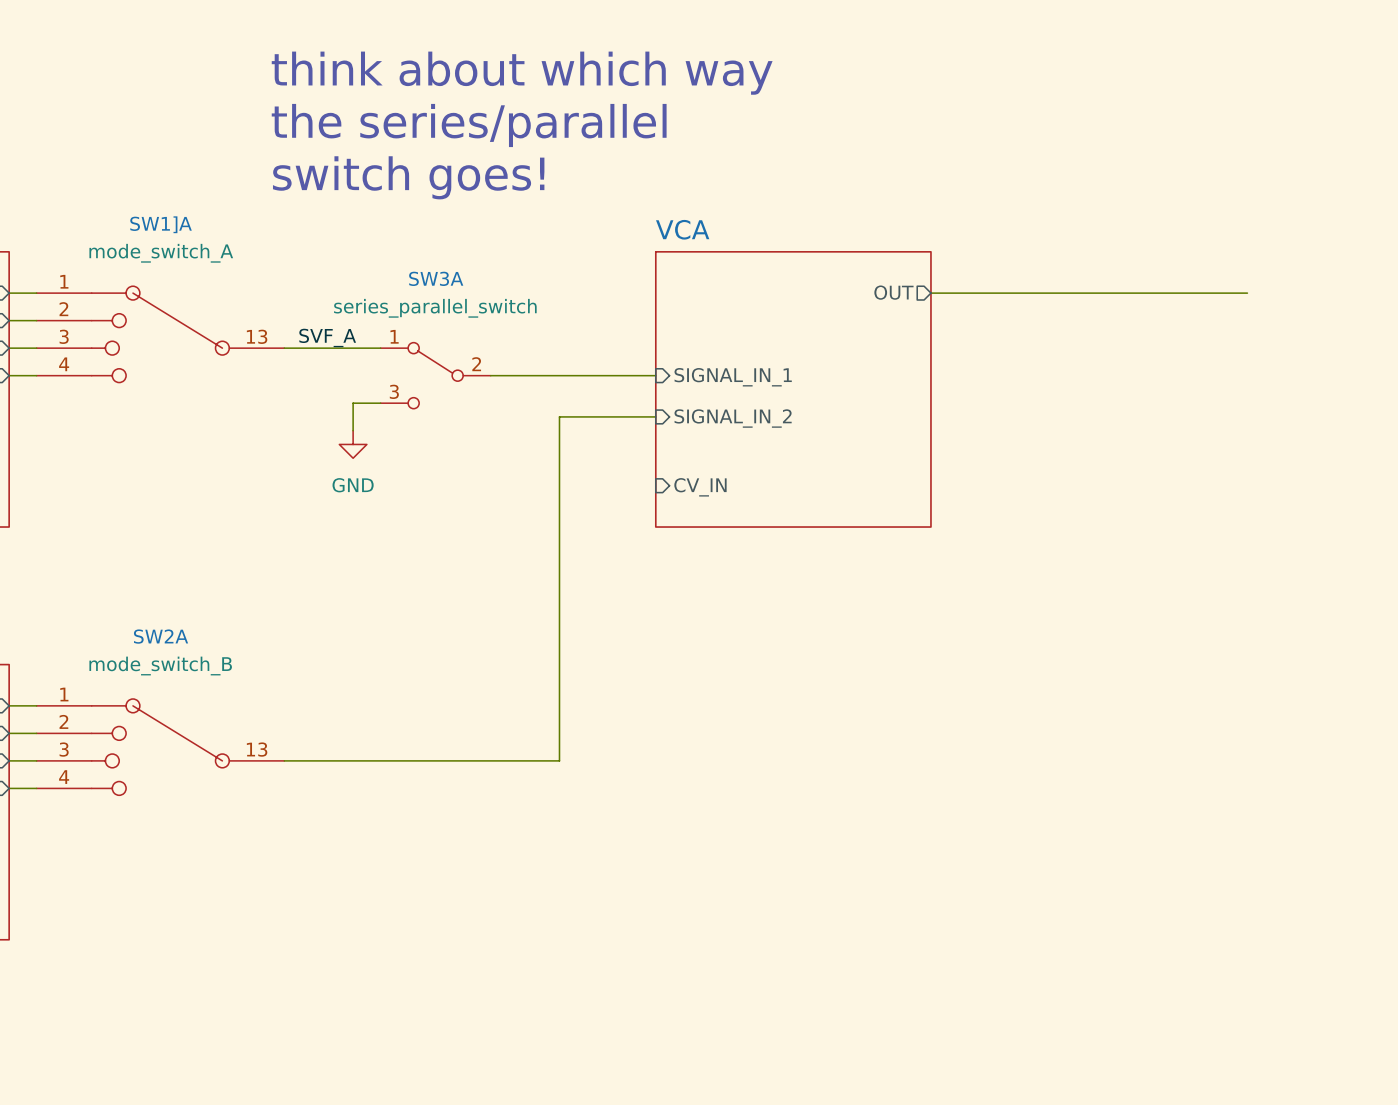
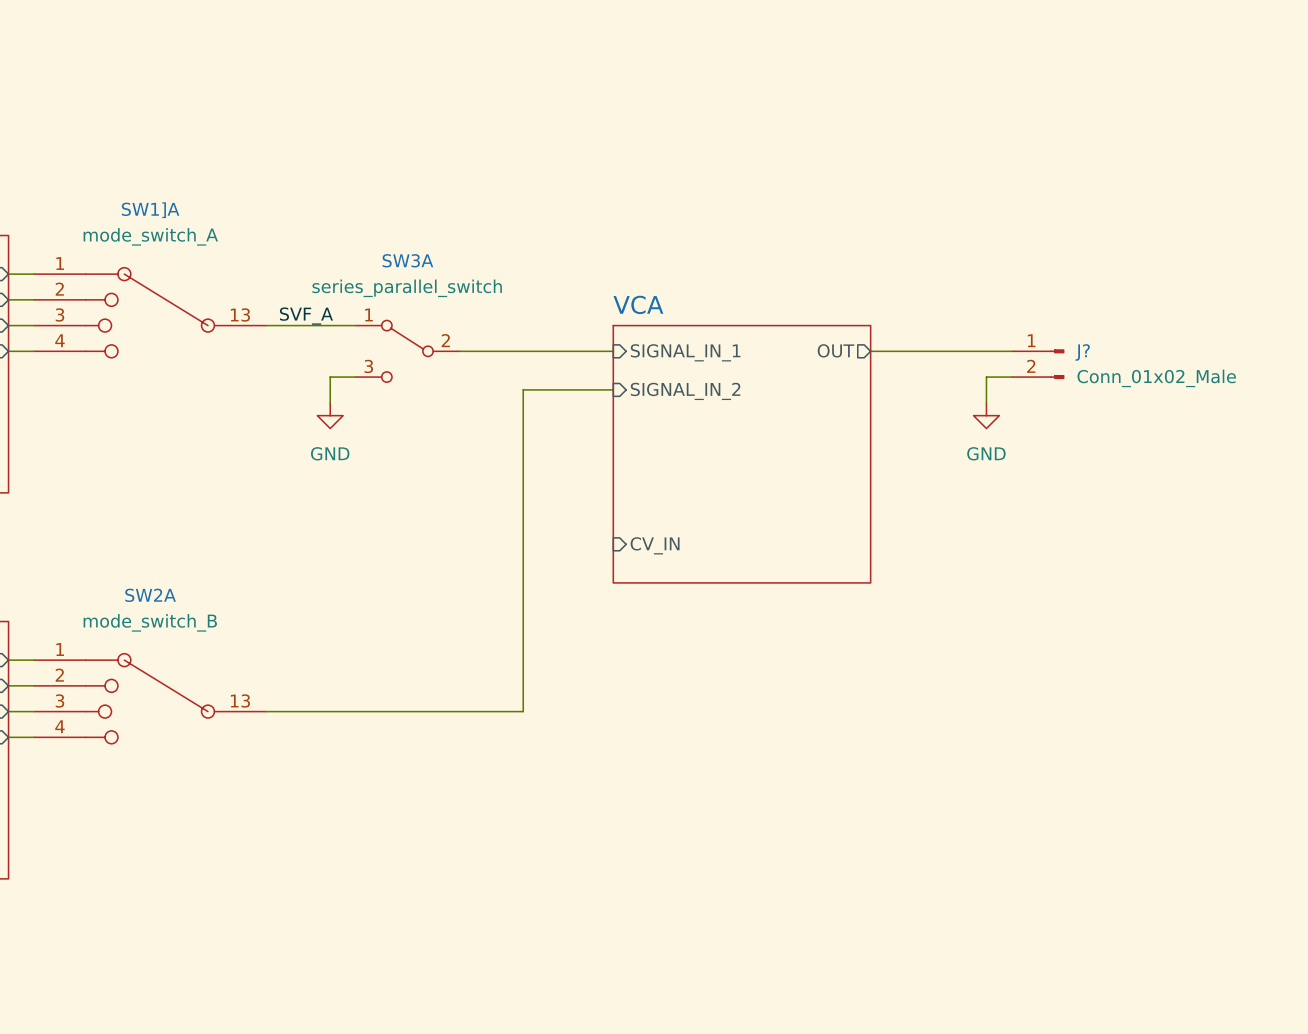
text: think about which way (522, 73) -> none
text: the series/parallel (469, 125) -> none
text: switch goes! (408, 177) -> none
sheet pin position: OUT (893, 292) -> OUT (836, 350)
wire: (930, 293) (1247, 293) -> none
wire: none -> (870, 351) (1012, 351)
sheet VCA position: (793, 389) -> (741, 454)
J?: none -> Conn_01x02_Male (1038, 364)
wire: none -> (1012, 377) (986, 377) (986, 402)
power symbol: none -> GND (986, 415)
sheet pin position: CV_IN (700, 487) -> CV_IN (655, 545)

